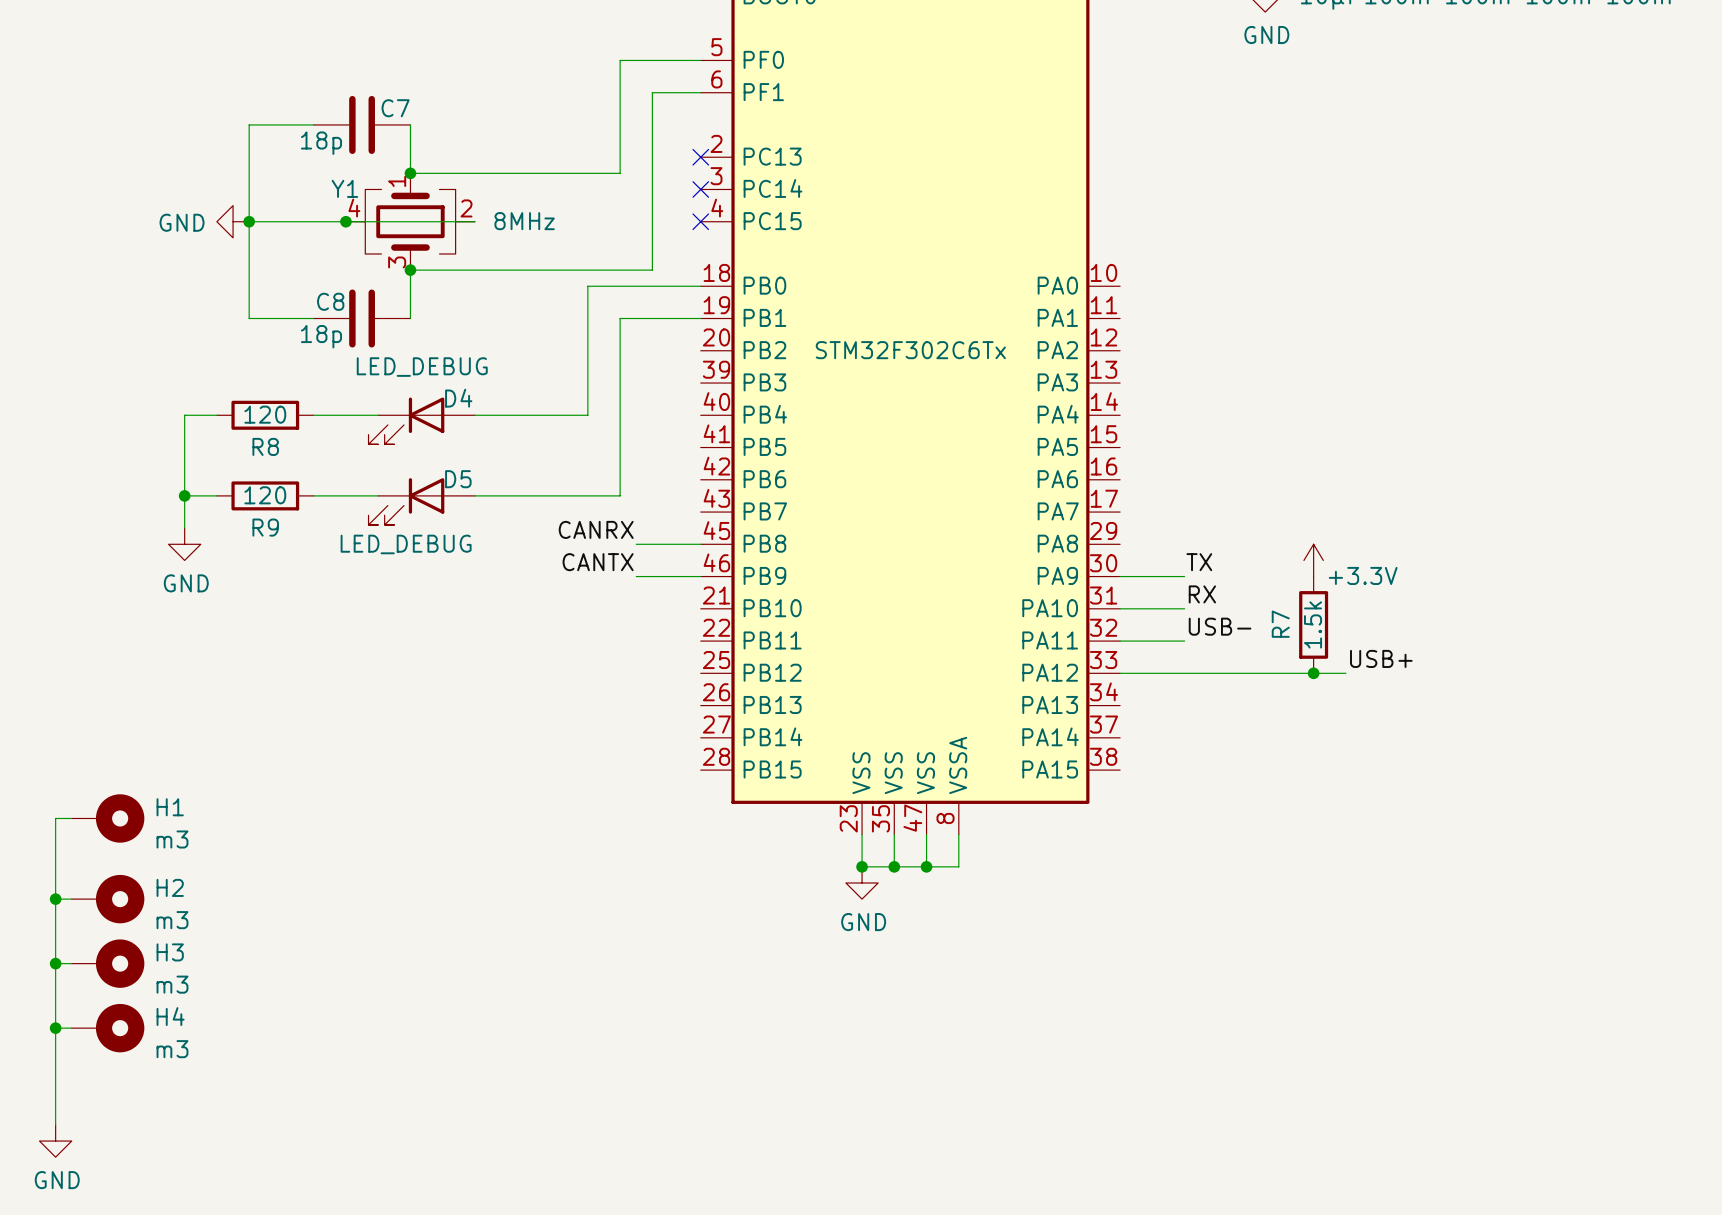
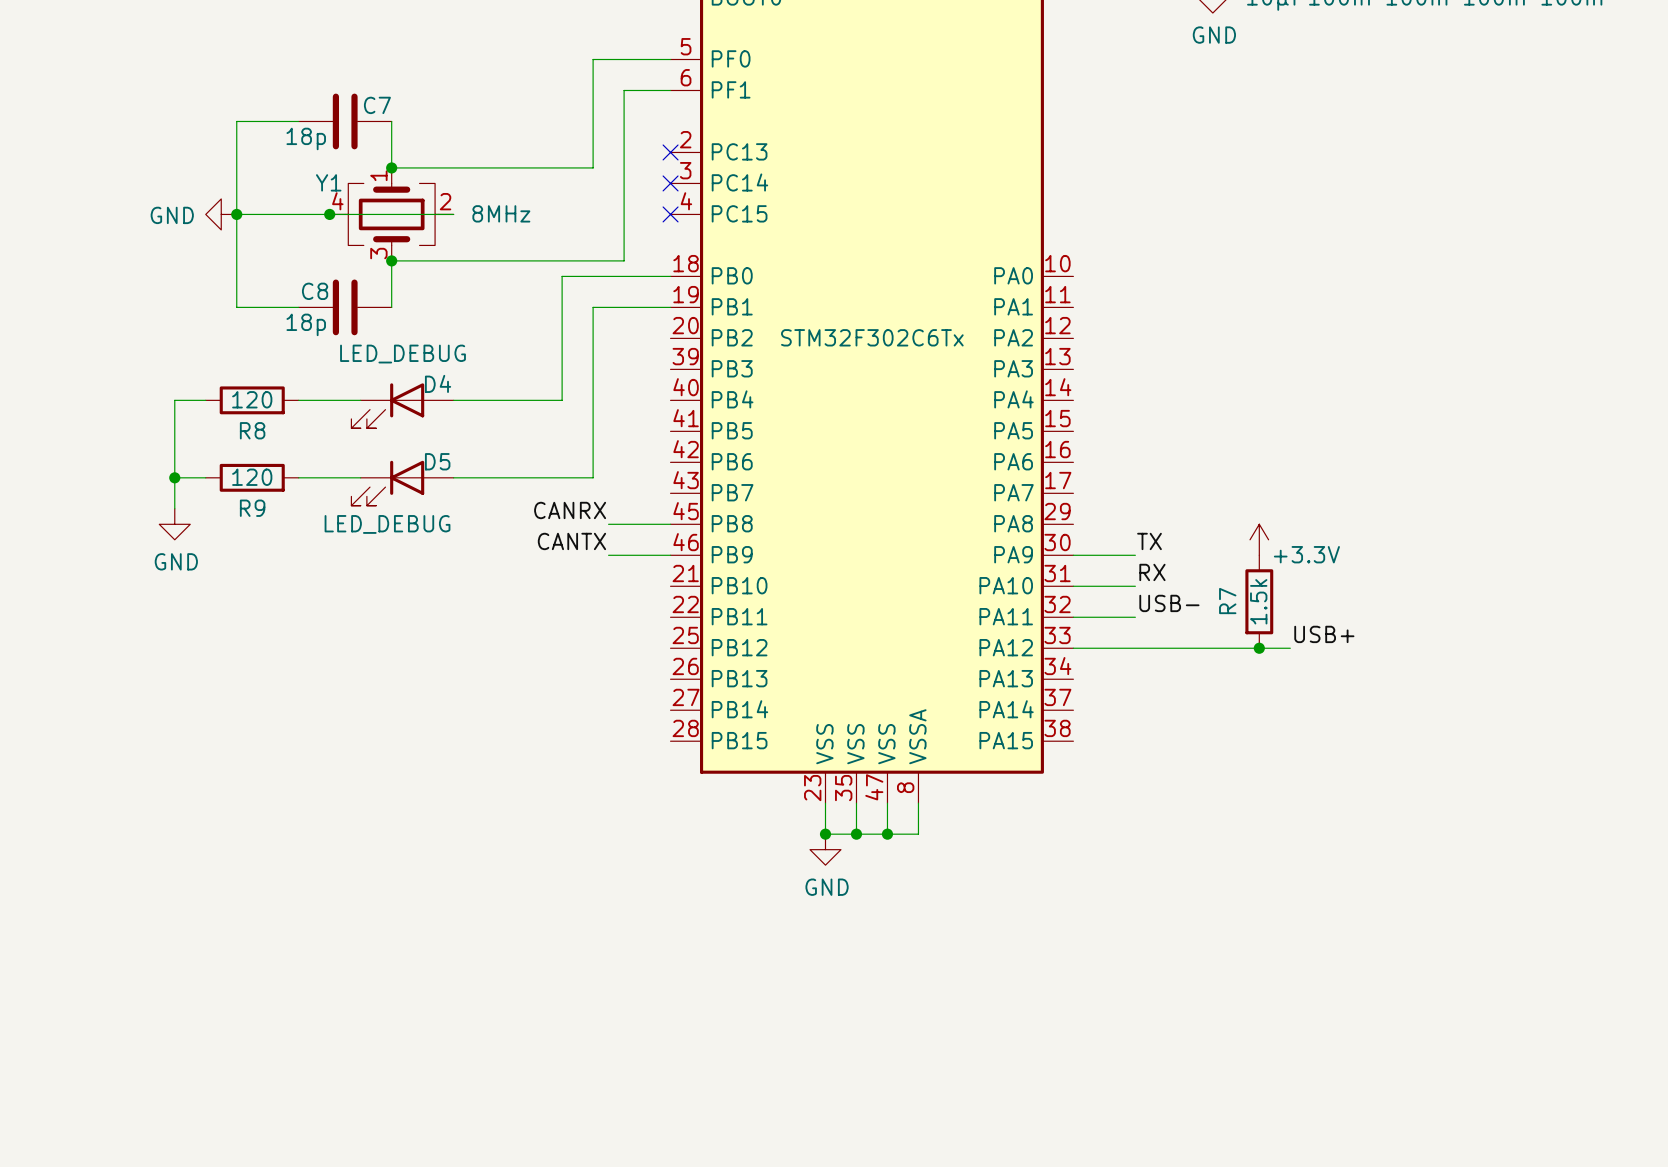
wire: (71, 818) (55, 818) (55, 1124) -> none
H1: m3 (108, 818) -> none
wire: (55, 899) (71, 899) -> none
junction: (55, 899) -> none
H2: m3 (108, 899) -> none
wire: (55, 963) (71, 963) -> none
junction: (55, 963) -> none
H3: m3 (108, 963) -> none
wire: (55, 1028) (71, 1028) -> none
junction: (55, 1028) -> none
H4: m3 (108, 1028) -> none
power symbol: GND (55, 1141) -> none

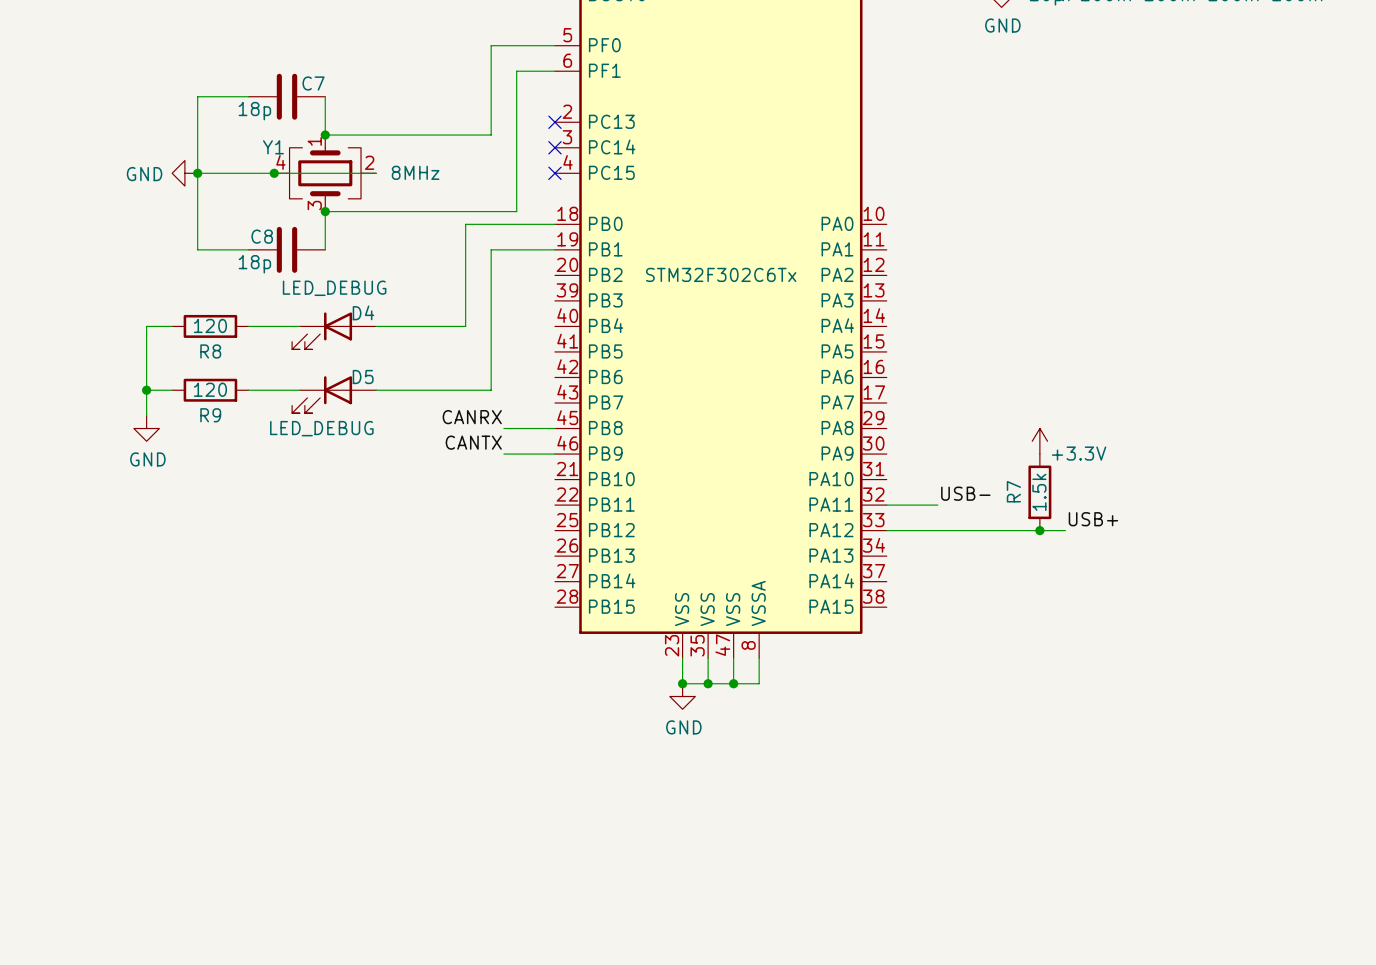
label: TX (1149, 541) -> none
wire: (1073, 555) (1135, 555) -> none
label: RX (1152, 572) -> none
wire: (1073, 586) (1135, 586) -> none

